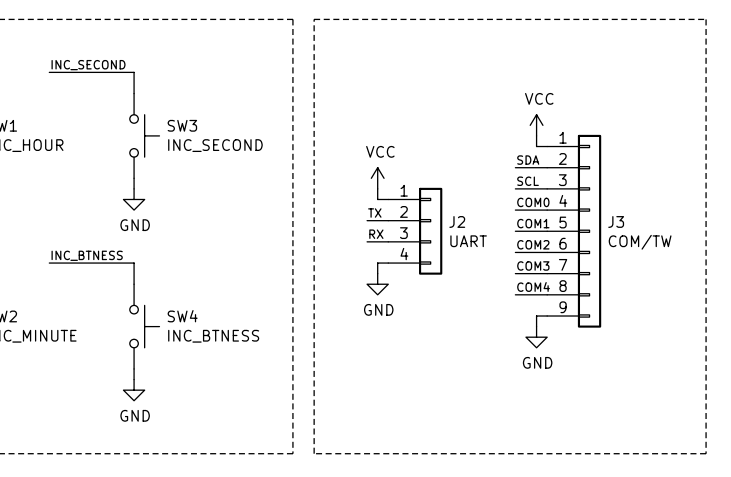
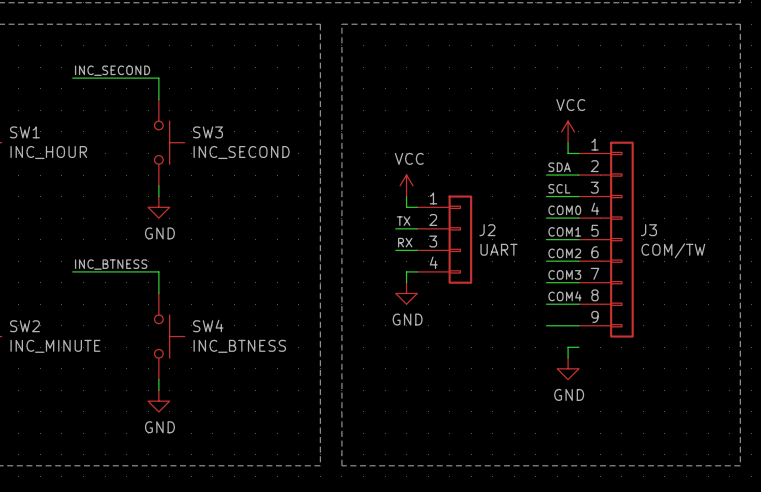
wire: (536, 316) (536, 326) -> (568, 325) (546, 325)
power symbol position: GND (536, 337) -> GND (568, 368)

